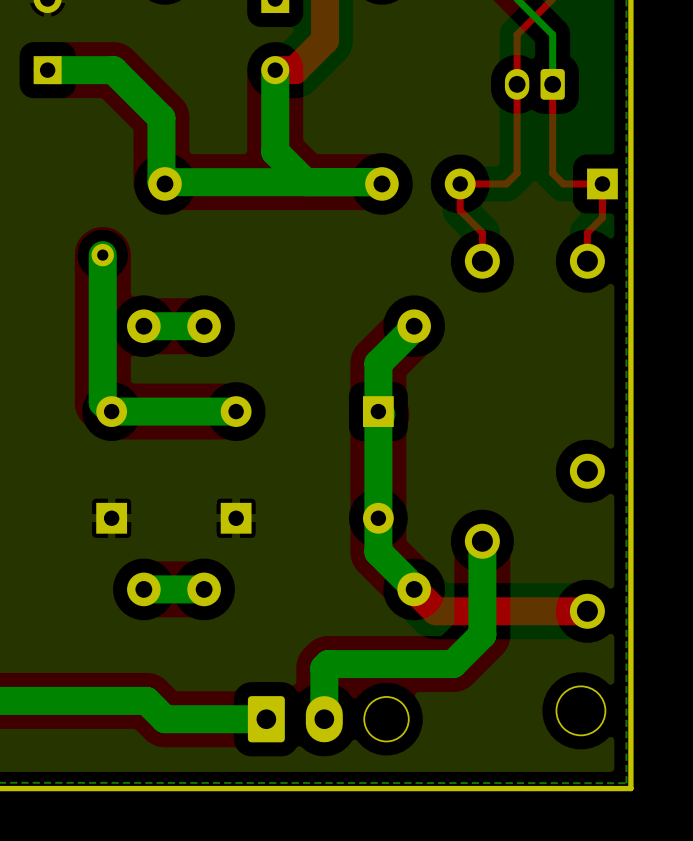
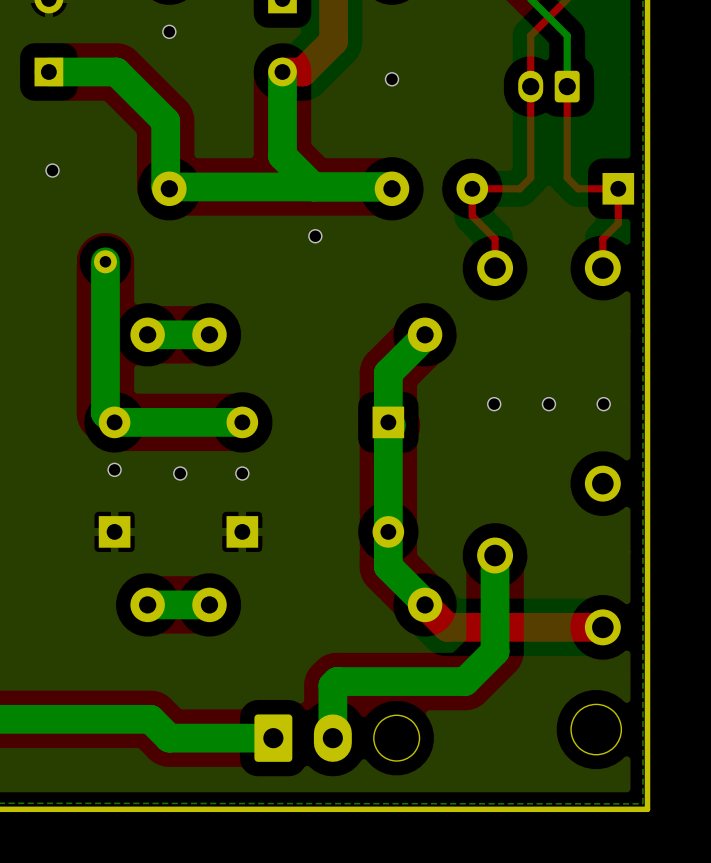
via: none -> (169, 31)
via: none -> (392, 79)
via: none -> (52, 170)
via: none -> (315, 236)
via: none -> (494, 404)
via: none -> (548, 404)
via: none -> (603, 404)
via: none -> (114, 469)
via: none -> (180, 473)
via: none -> (242, 473)

